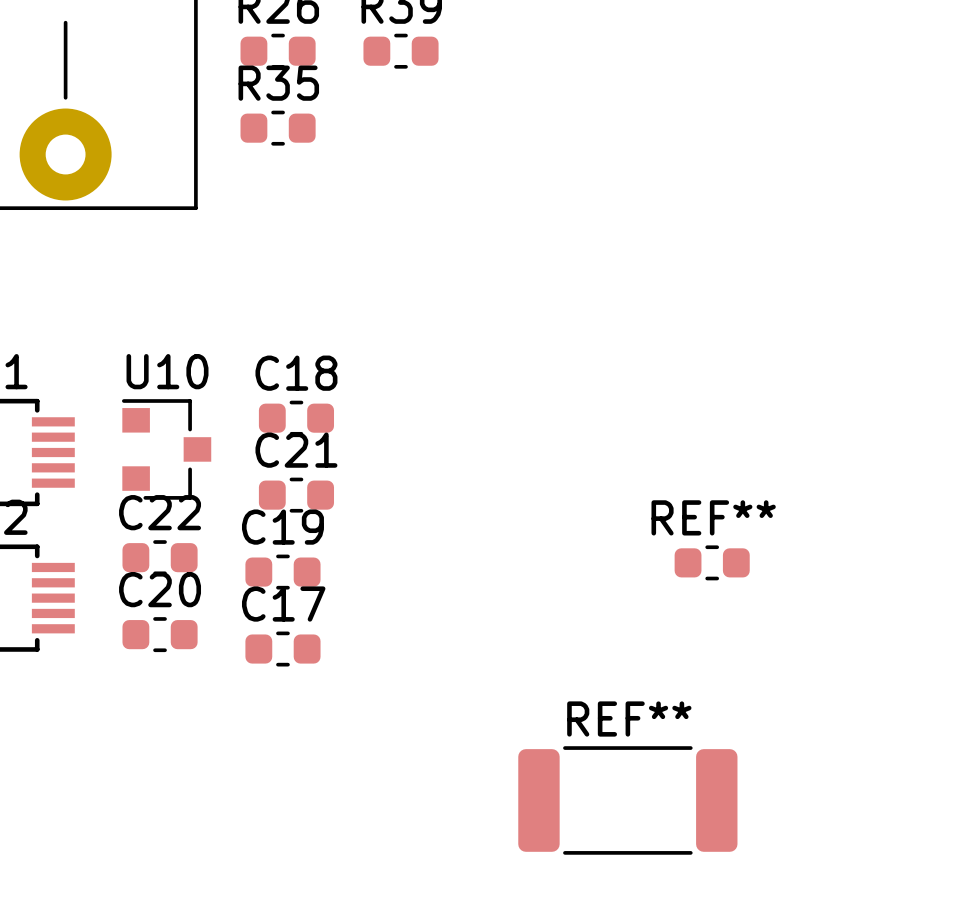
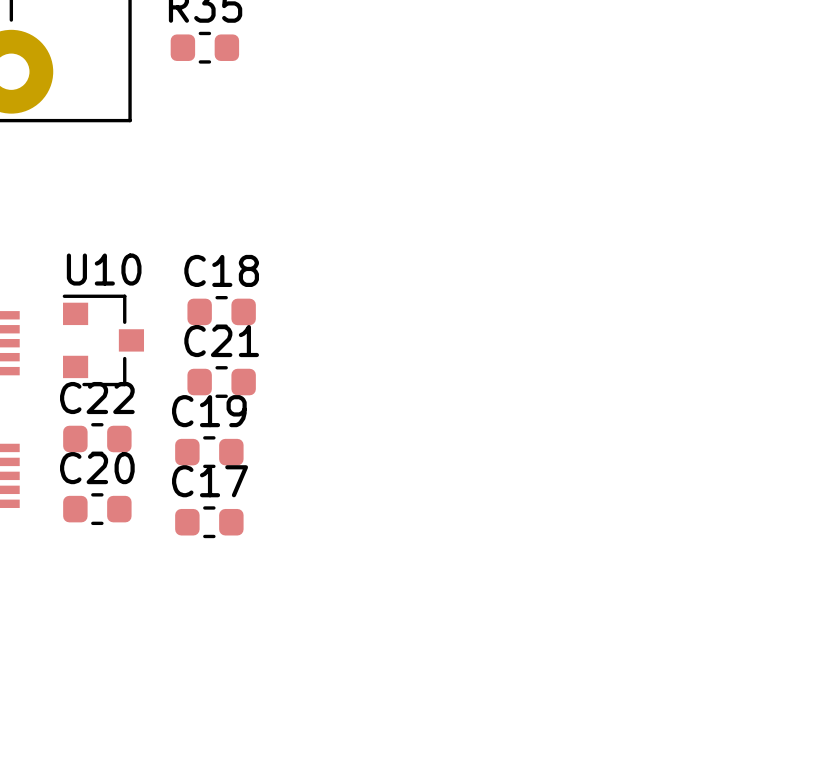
REF**: (712, 562) -> none
REF**: (627, 800) -> none

